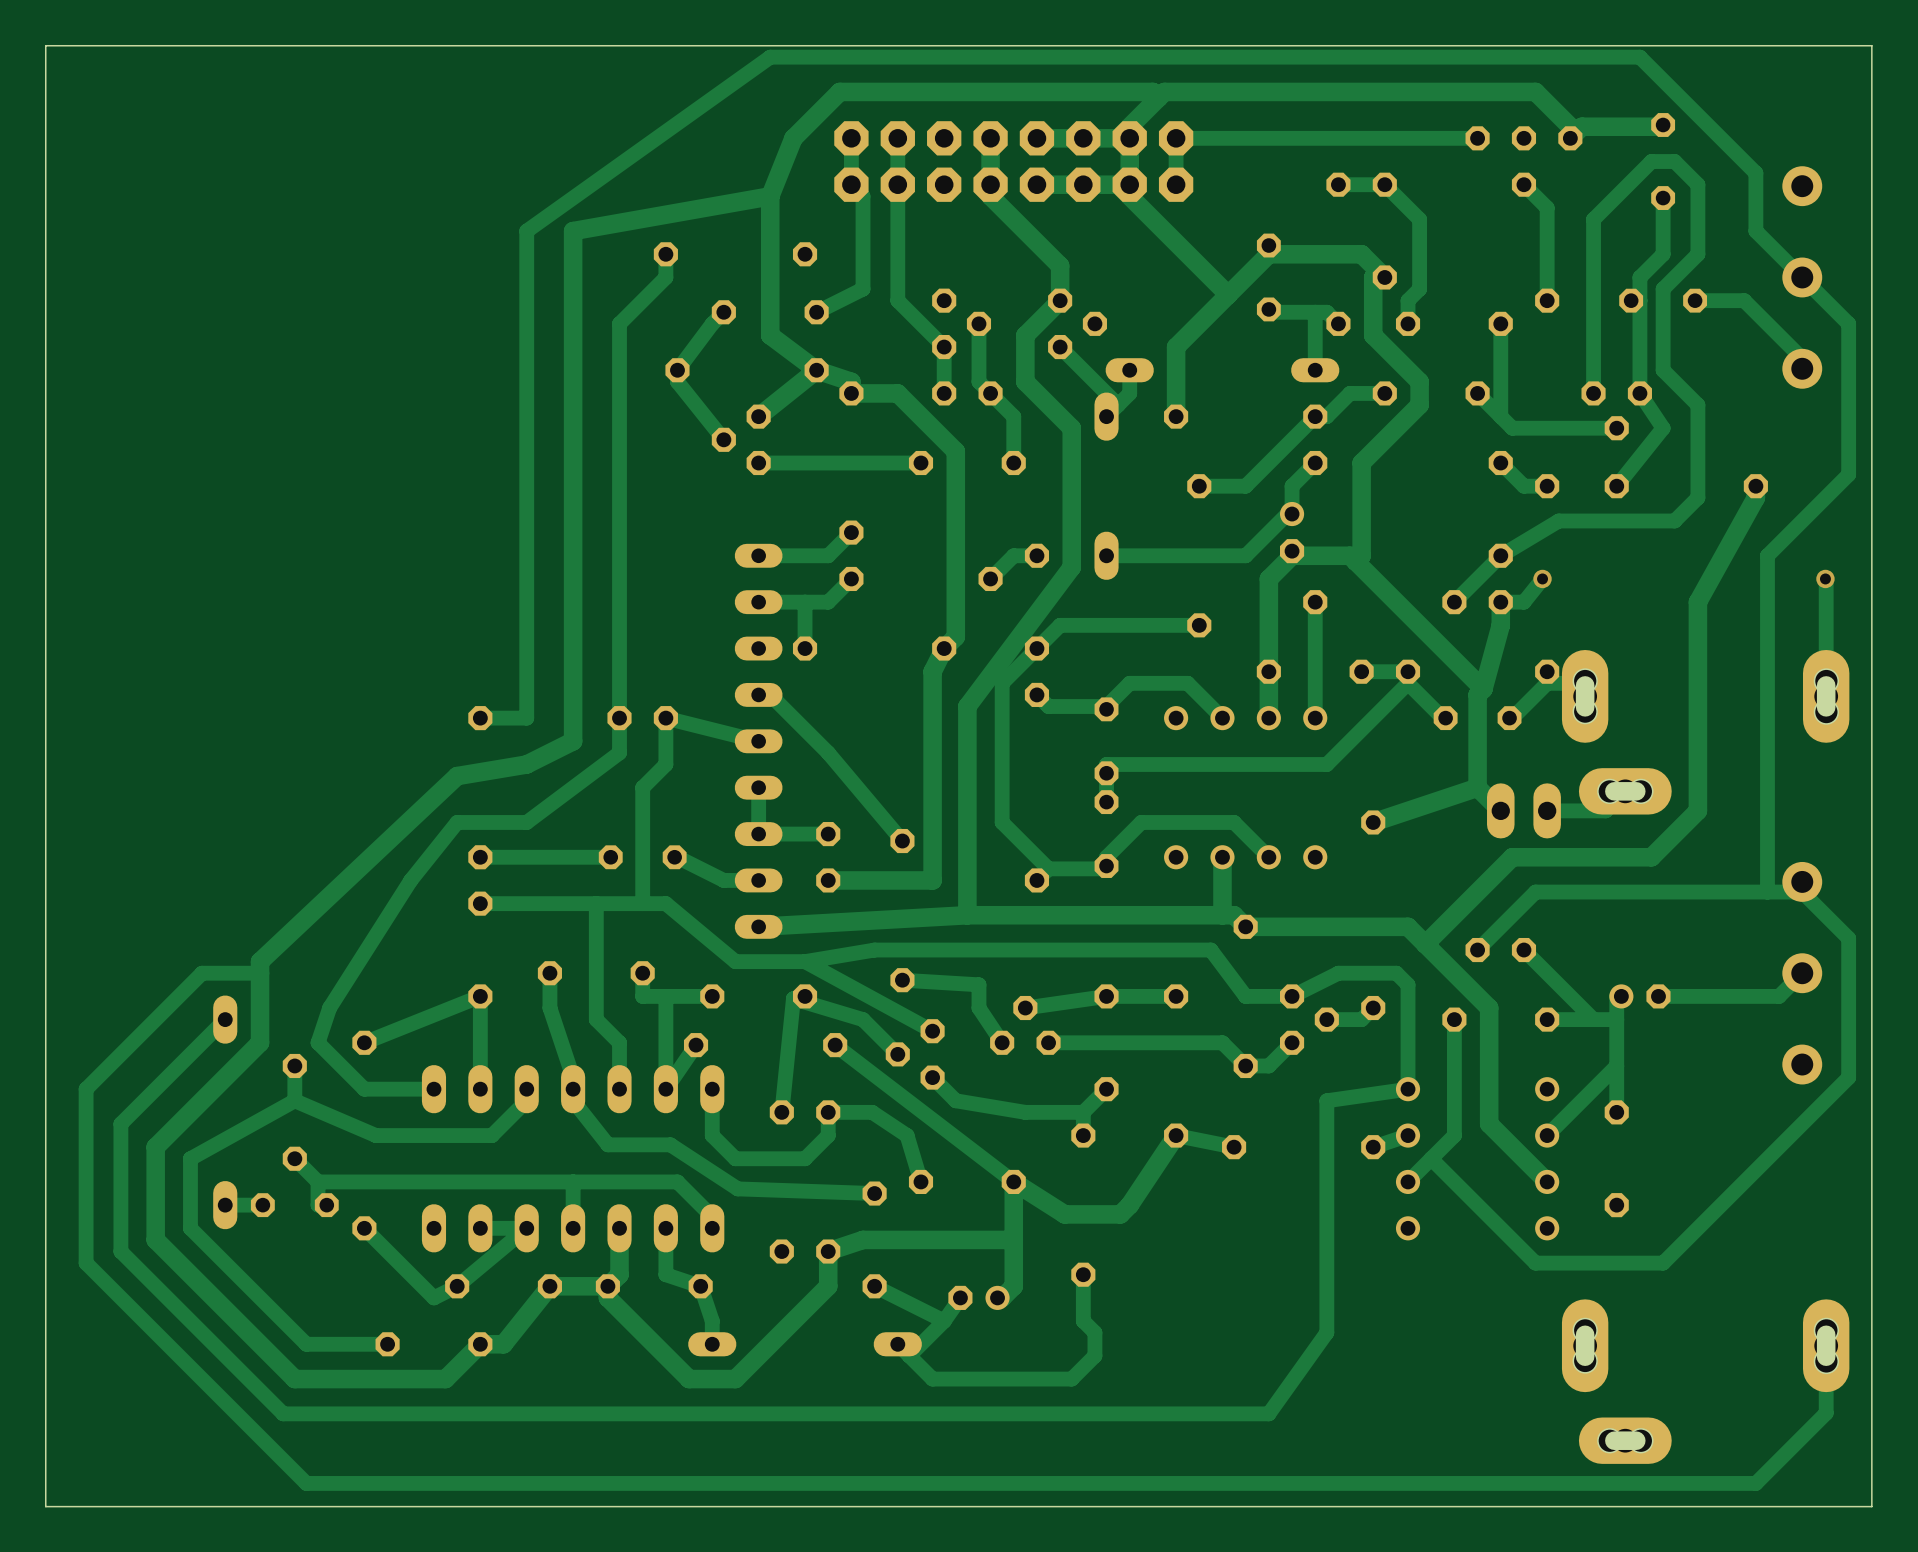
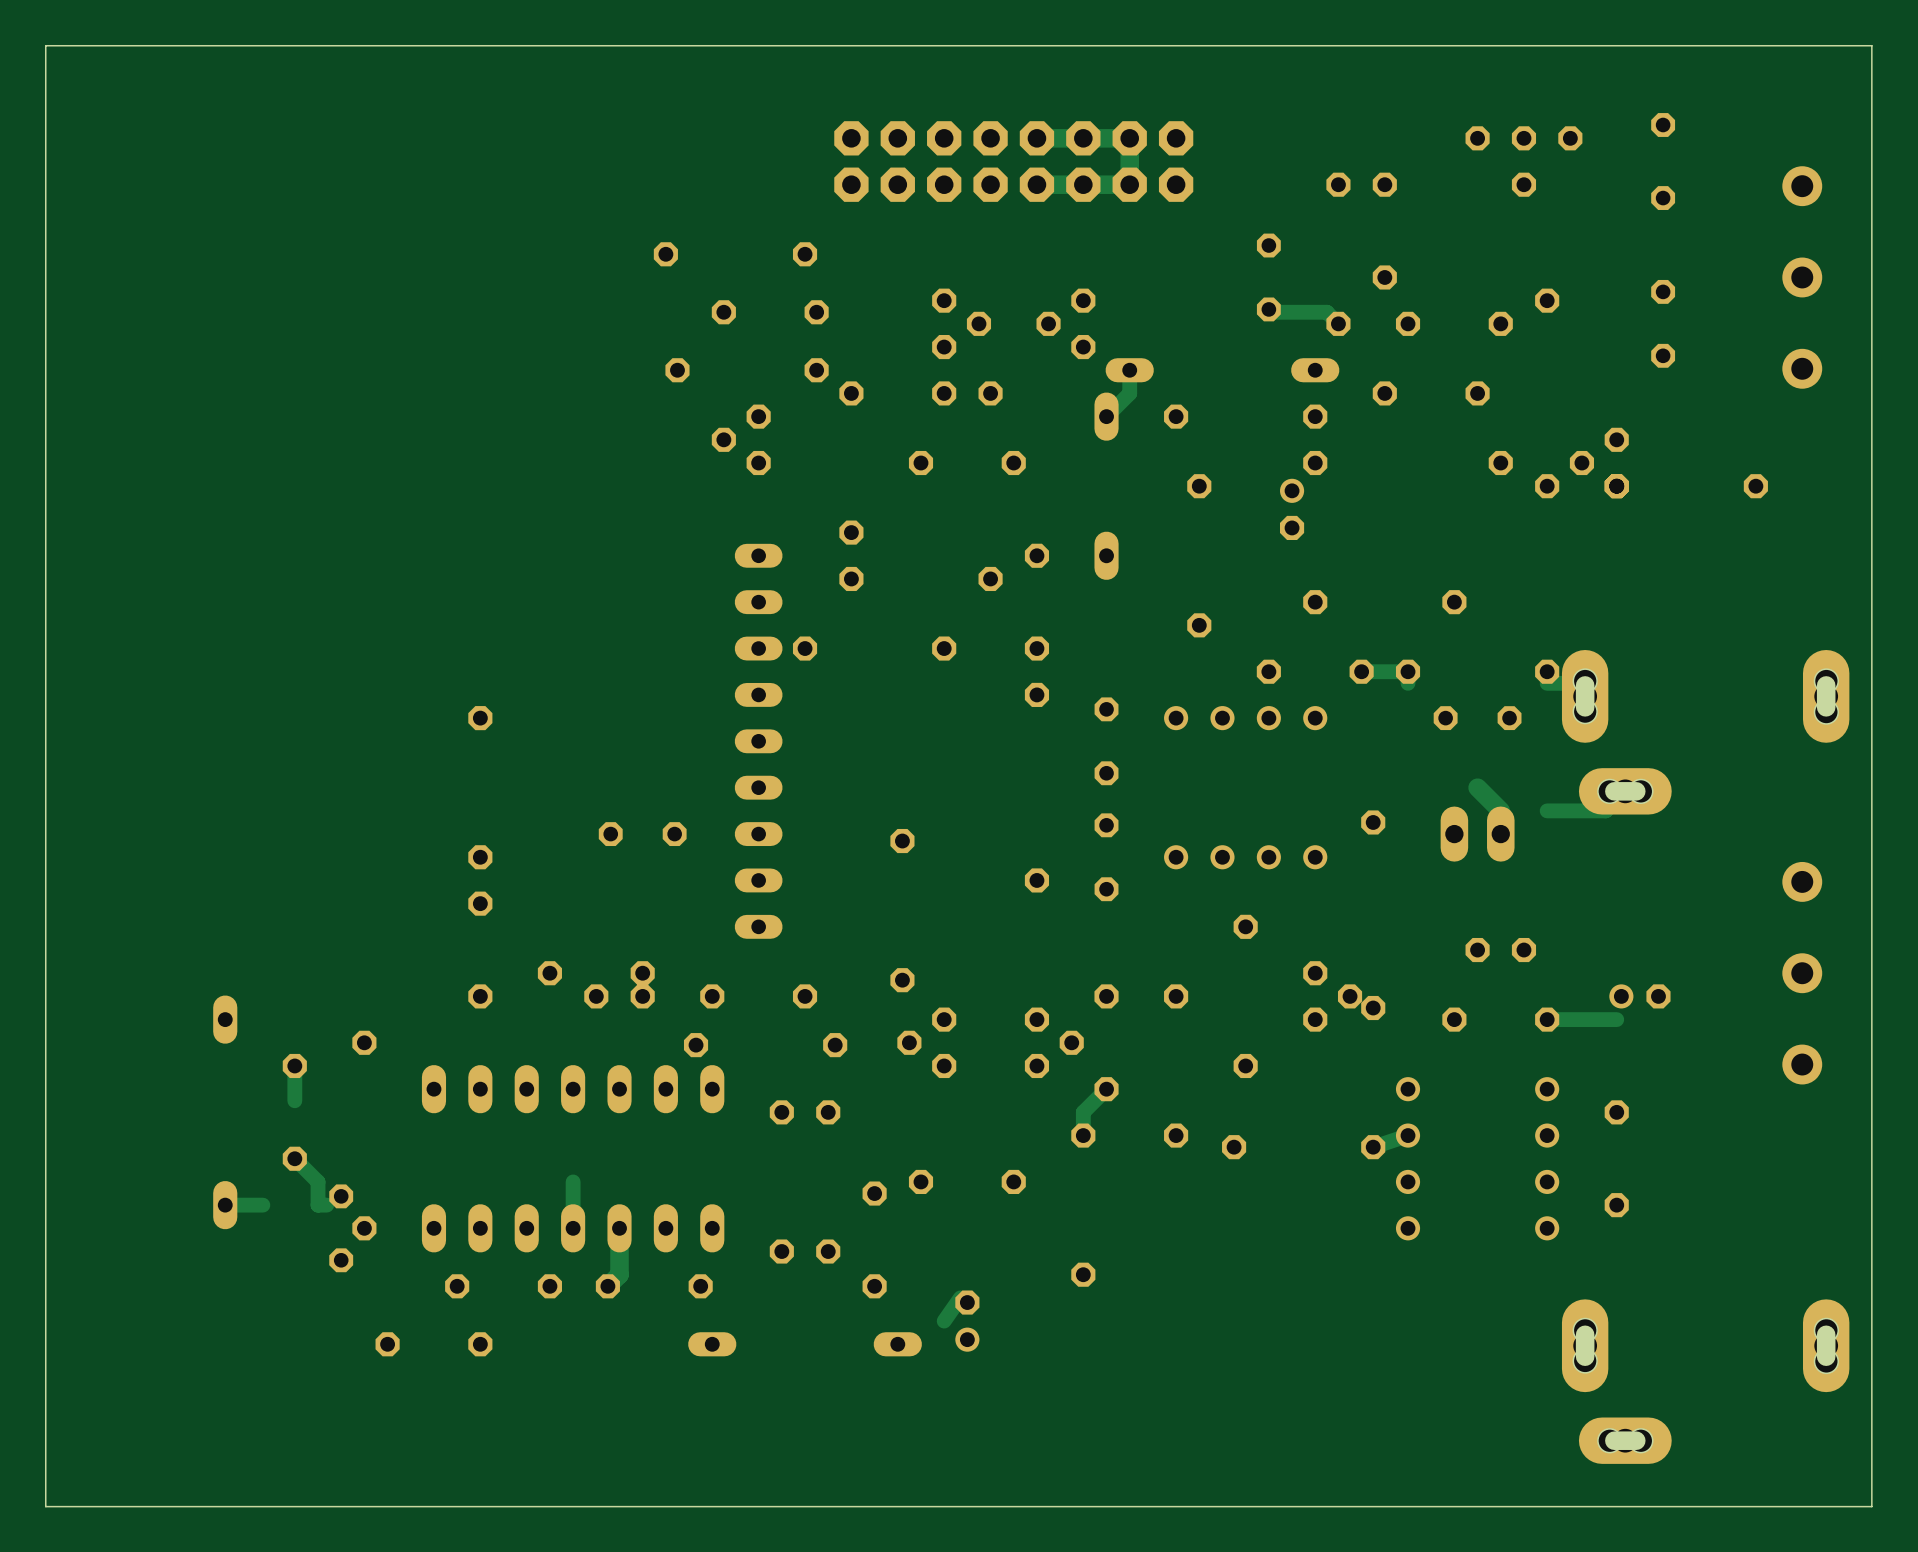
track: (1158, 97) (1152, 91) (839, 91) (793, 138) (770, 196) -> none
track: (1663, 125) (1663, 126) (1581, 126) (1570, 138) (1570, 126) (1535, 91) (1164, 91) (1118, 138) -> none
track: (851, 138) (851, 184) (863, 196) (863, 289) (816, 312) -> none
track: (897, 138) (897, 300) (944, 347) (944, 393) -> none
track: (990, 138) (990, 196) (1060, 265) (1060, 300) (1025, 335) (1025, 381) (1071, 428) (1071, 567) (967, 706) (967, 915) -> none
track: (1477, 138) (1176, 138) (1176, 184) -> none
track: (1118, 184) (1228, 294) -> none
track: (1338, 184) (1384, 184) (1419, 219) (1419, 289) (1408, 300) (1408, 323) -> none
track: (1523, 184) (1547, 207) (1547, 300) -> none
track: (770, 196) (770, 335) (816, 370) -> none
track: (770, 196) (573, 231) (573, 741) (526, 764) (457, 776) (260, 961) (260, 1042) (155, 1147) (155, 1239) (294, 1379) (445, 1379) (480, 1344) (503, 1344) (549, 1286) (607, 1286) (607, 1297) (689, 1379) (735, 1379) (828, 1286) (828, 1251) (863, 1239) (1013, 1239) -> none
track: (1663, 198) (1663, 254) (1639, 277) (1639, 393) (1663, 428) (1616, 486) -> none
track: (665, 254) (665, 277) (619, 323) (619, 752) (526, 822) (457, 822) (410, 880) (329, 1008) (318, 1042) (364, 1089) (433, 1089) -> none
track: (1268, 254) (1361, 254) (1384, 277) (1373, 277) (1373, 335) (1419, 381) (1419, 405) (1361, 463) (1361, 555) (1355, 561) -> none
track: (1268, 254) (1176, 347) (1176, 416) -> none
part rotation: 0° (1663, 300) -> 90° clockwise (1663, 323)
track: (1695, 300) (1744, 300) (1802, 358) (1802, 368) -> none
track: (723, 312) (712, 323) (677, 370) (677, 381) (723, 439) -> none
track: (1315, 312) (1315, 370) -> none
track: (978, 323) (978, 381) (1013, 416) (1013, 463) -> none
part rotation: 0° (1077, 323) -> 180° (1065, 323)
track: (1500, 323) (1500, 416) -> none
track: (1060, 347) (1118, 405) -> none
track: (816, 370) (851, 381) (851, 393) (897, 393) (955, 451) (955, 636) (944, 648) (932, 671) (932, 880) (828, 880) -> none
track: (816, 370) (758, 416) -> none
track: (1384, 393) (1350, 393) (1326, 416) (1315, 416) (1245, 486) (1199, 486) -> none
track: (1477, 393) (1512, 428) (1616, 428) -> none
track: (1593, 393) (1593, 219) (1651, 161) (1674, 161) (1697, 184) (1697, 254) (1663, 289) (1663, 370) (1697, 405) (1697, 497) (1674, 520) (1558, 520) (1500, 555) (1454, 602) -> none
part rotation: 0° (1616, 410) -> 90° clockwise (1599, 463)
part position: (1616, 410) -> (1599, 463)
track: (920, 463) (758, 463) -> none
track: (1315, 463) (1292, 486) (1292, 514) -> none
track: (1500, 463) (1523, 486) (1547, 486) -> none
track: (1755, 486) (1755, 497) (1697, 602) (1697, 810) (1651, 857) (1512, 857) (1425, 944) -> none
track: (1292, 509) (1245, 555) (1106, 555) -> none
track: (851, 532) (828, 555) (758, 555) -> none
part position: (1292, 532) -> (1292, 509)
track: (1036, 555) (1013, 555) (990, 578) -> none
track: (1292, 555) (1350, 555) (1483, 689) -> none
track: (1292, 555) (1268, 578) (1268, 718) -> none
track: (851, 578) (828, 602) (758, 602) -> none
part: (1500, 578) -> none
track: (1542, 578) (1523, 602) (1500, 602) (1500, 625) (1483, 689) -> none
via: (1542, 578) -> none
track: (1825, 578) (1826, 696) -> none
via: (1825, 578) -> none
track: (805, 602) (805, 648) -> none
track: (1315, 602) (1315, 718) -> none
track: (1199, 625) (1060, 625) (1002, 683) (1002, 822) (1048, 868) -> none
track: (1547, 671) (1547, 683) (1512, 718) (1509, 718) -> none
track: (1483, 689) (1477, 694) (1477, 787) (1373, 822) -> none
track: (758, 694) (770, 694) (828, 752) (902, 841) -> none
track: (1036, 694) (1048, 706) (1106, 706) -> none
track: (1106, 706) (1129, 683) (1187, 683) (1222, 718) -> none
track: (480, 718) (526, 718) (526, 231) (770, 57) (1639, 57) (1755, 173) (1755, 231) (1848, 323) (1848, 474) (1767, 555) (1767, 892) -> none
part: (642, 718) -> none
track: (1445, 718) (1442, 718) (1408, 683) (1326, 764) (1106, 764) (1106, 802) -> none
track: (758, 741) (665, 718) (665, 764) (642, 787) (642, 903) -> none
track: (758, 787) (758, 834) (828, 834) -> none
part position: (1523, 810) -> (1477, 834)
part position: (1106, 834) -> (1106, 857)
track: (610, 857) (480, 857) -> none
part position: (642, 857) -> (642, 834)
track: (674, 857) (723, 880) (758, 880) -> none
part: (828, 857) -> none
track: (1222, 857) (1222, 915) -> none
track: (1268, 857) (1234, 822) (1141, 822) (1106, 857) (1106, 868) (1048, 868) -> none
track: (1802, 892) (1535, 892) (1477, 950) -> none
track: (1802, 892) (1848, 938) (1848, 1077) (1663, 1263) (1535, 1263) (1431, 1158) -> none
track: (480, 903) (665, 903) (735, 961) (805, 961) -> none
track: (596, 903) (596, 1019) (619, 1042) (619, 1100) -> none
track: (967, 915) (758, 926) -> none
track: (967, 915) (1234, 915) (1245, 926) (1408, 926) (1489, 1008) (1489, 1123) (1547, 1181) -> none
track: (1523, 950) (1593, 1019) -> none
track: (805, 961) (932, 1031) -> none
track: (805, 961) (874, 950) (1210, 950) (1245, 996) (1292, 996) (1338, 973) (1396, 973) (1408, 984) (1408, 1089) (1326, 1100) (1326, 1332) (1268, 1413) (283, 1413) (120, 1251) (120, 1123) (225, 1019) -> none
track: (260, 973) (202, 973) (86, 1089) (86, 1263) (306, 1483) (1755, 1483) (1826, 1413) (1826, 1345) -> none
track: (549, 973) (549, 1008) (573, 1077) (573, 1100) (607, 1144) (670, 1144) (737, 1188) (874, 1193) -> none
track: (642, 973) (642, 996) (712, 996) -> none
track: (1802, 973) (1779, 996) (1658, 996) -> none
track: (902, 980) (978, 984) (978, 1008) (1002, 1042) -> none
part: none -> (619, 996)
track: (665, 996) (665, 1089) (696, 1045) -> none
track: (1176, 996) (1106, 996) (1025, 1008) -> none
track: (1621, 996) (1616, 996) (1616, 1112) -> none
track: (793, 998) (863, 1019) (897, 1054) -> none
track: (793, 998) (781, 1112) -> none
track: (1373, 1008) (1361, 1019) (1326, 1019) -> none
part position: (1309, 1019) -> (1332, 996)
track: (1454, 1019) (1454, 1135) (1408, 1181) -> none
part rotation: 0° (1025, 1025) -> 90° clockwise (1054, 1042)
track: (364, 1042) (480, 996) (480, 1089) -> none
track: (1292, 1042) (1268, 1065) (1245, 1065) (1222, 1042) (1048, 1042) -> none
track: (835, 1045) (1013, 1181) -> none
part position: (915, 1054) -> (926, 1042)
track: (1616, 1065) (1547, 1135) -> none
track: (932, 1077) (955, 1100) (1025, 1112) (1083, 1112) -> none
track: (526, 1089) (526, 1100) (491, 1135) (375, 1135) (294, 1100) (190, 1158) (190, 1228) (306, 1344) (387, 1344) -> none
track: (712, 1089) (712, 1135) (735, 1158) (805, 1158) (828, 1135) (828, 1112) (872, 1112) (907, 1135) (920, 1181) -> none
track: (1234, 1147) (1176, 1135) (1129, 1205) (1120, 1214) (1064, 1214) (1013, 1181) -> none
track: (318, 1181) (677, 1181) (712, 1216) (712, 1228) -> none
track: (1013, 1181) (1013, 1286) (1002, 1297) (997, 1297) -> none
part rotation: 0° (294, 1205) -> 90° clockwise (341, 1228)
track: (480, 1228) (526, 1228) (457, 1286) (433, 1297) (364, 1228) -> none
track: (665, 1228) (665, 1274) (700, 1286) (712, 1321) (712, 1344) -> none
track: (1083, 1274) (1083, 1321) (1094, 1332) (1094, 1355) (1071, 1379) (932, 1379) (897, 1344) -> none
track: (874, 1286) (944, 1321) (909, 1355) -> none
part rotation: 0° (978, 1297) -> 90° clockwise (967, 1321)

